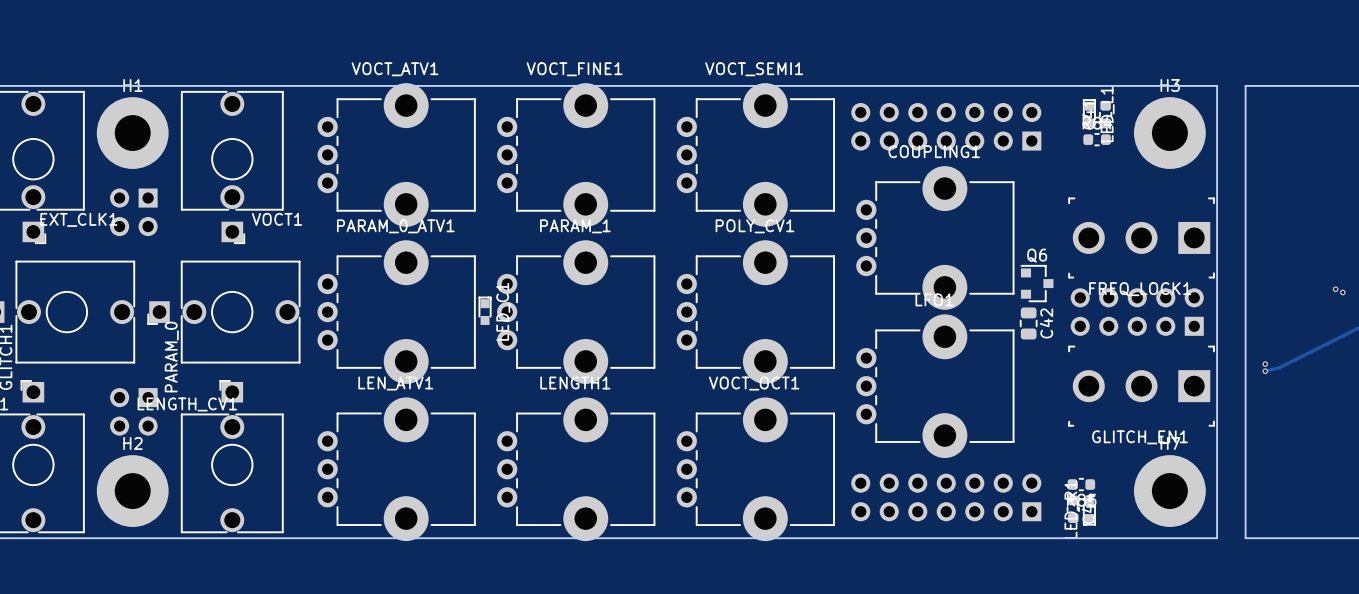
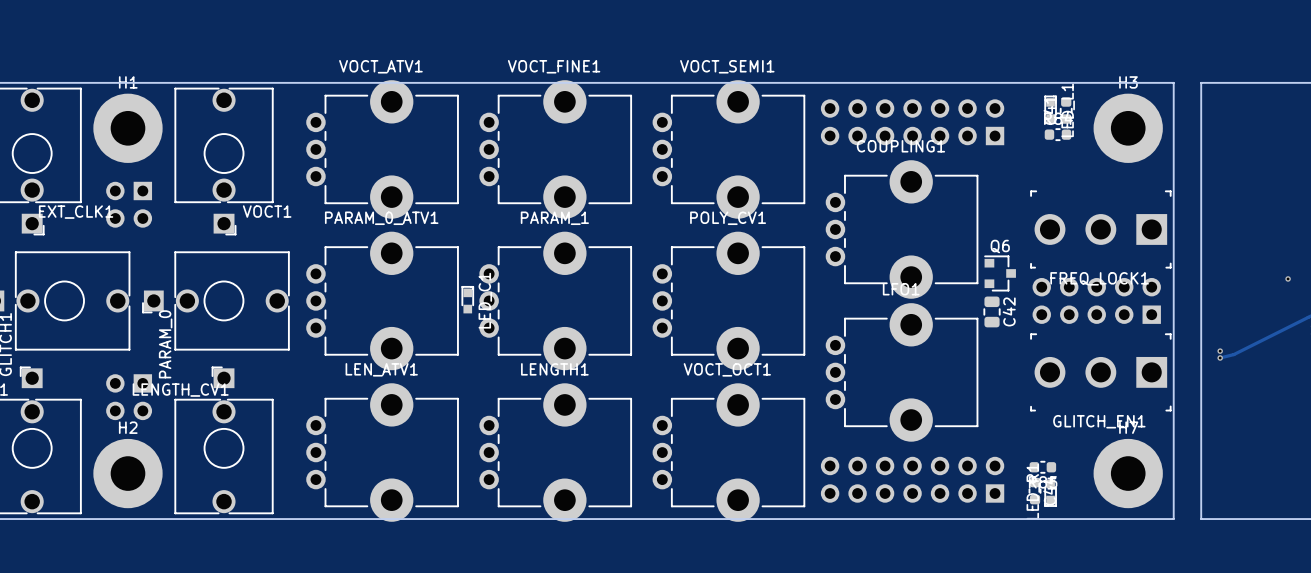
via: (1342, 292) -> none

